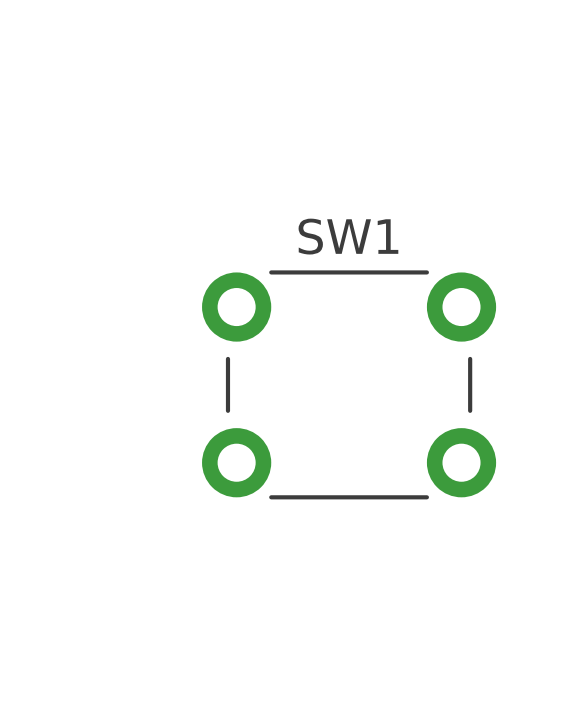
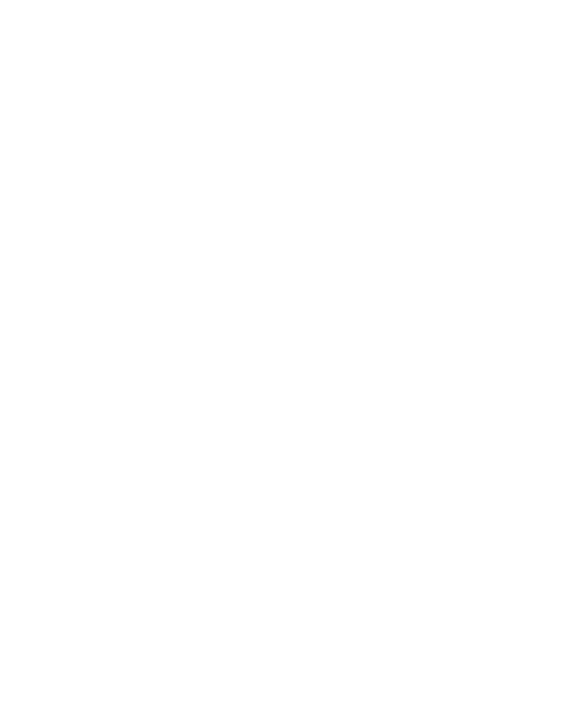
SW1: (349, 384) -> none

